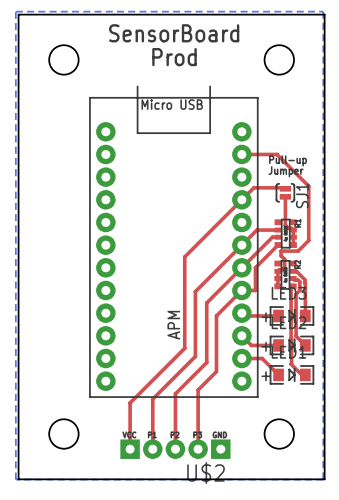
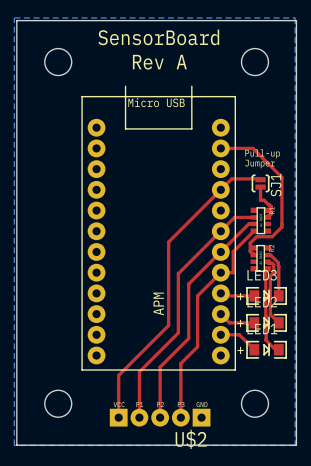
text: Prod (174, 57) -> Rev A (159, 62)
top track: (285, 211) (285, 225) (293, 230) (293, 245) -> (260, 200) (264, 200) (271, 206) (271, 214) (266, 217)
top track: (281, 251) (281, 255) (284, 259) (284, 267) (277, 271) (277, 286) -> (256, 236) (250, 243) (250, 251) (255, 255)

